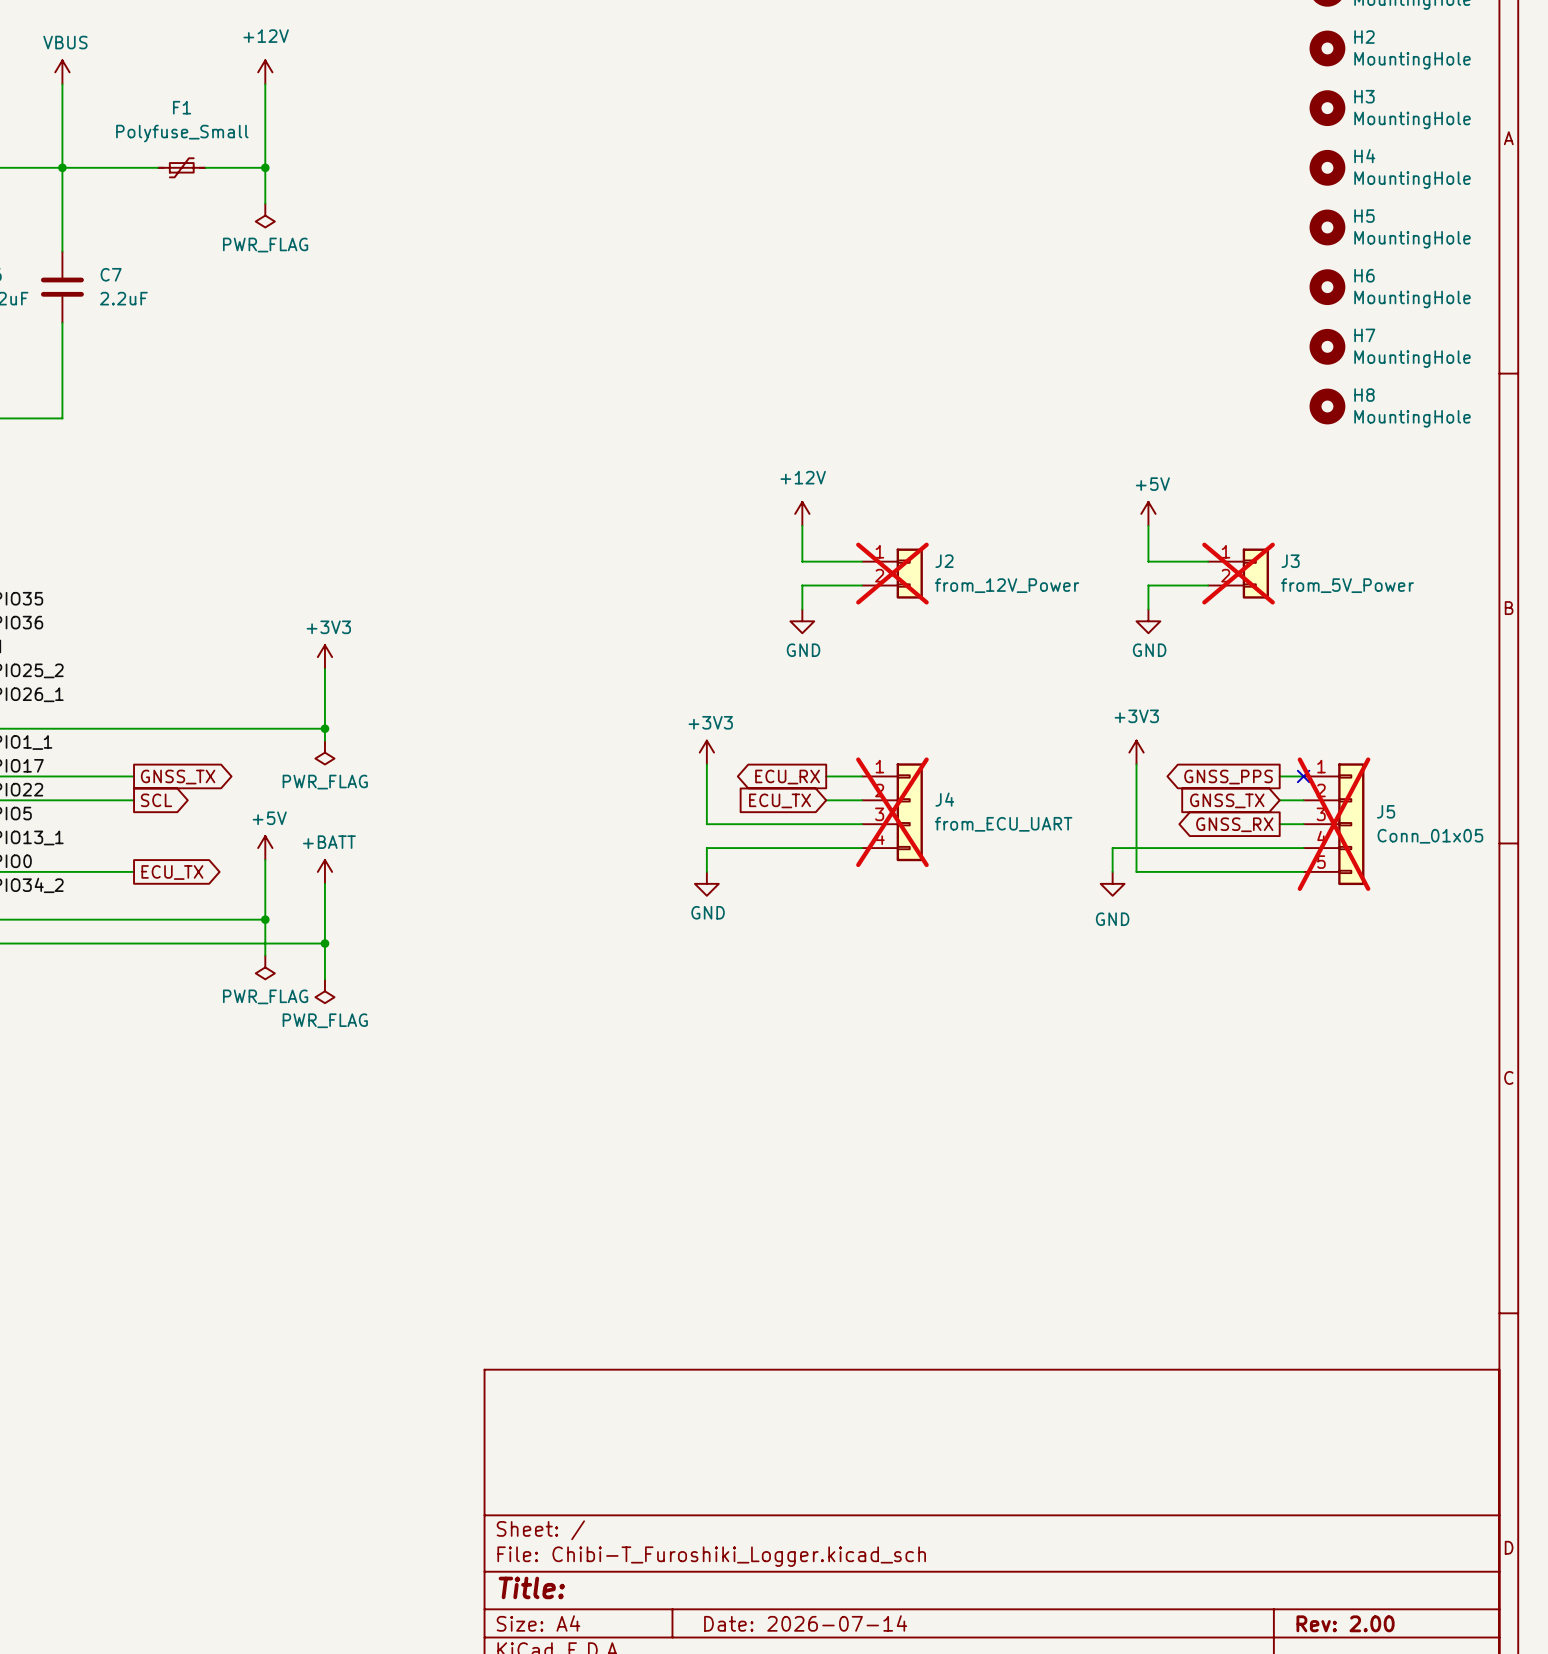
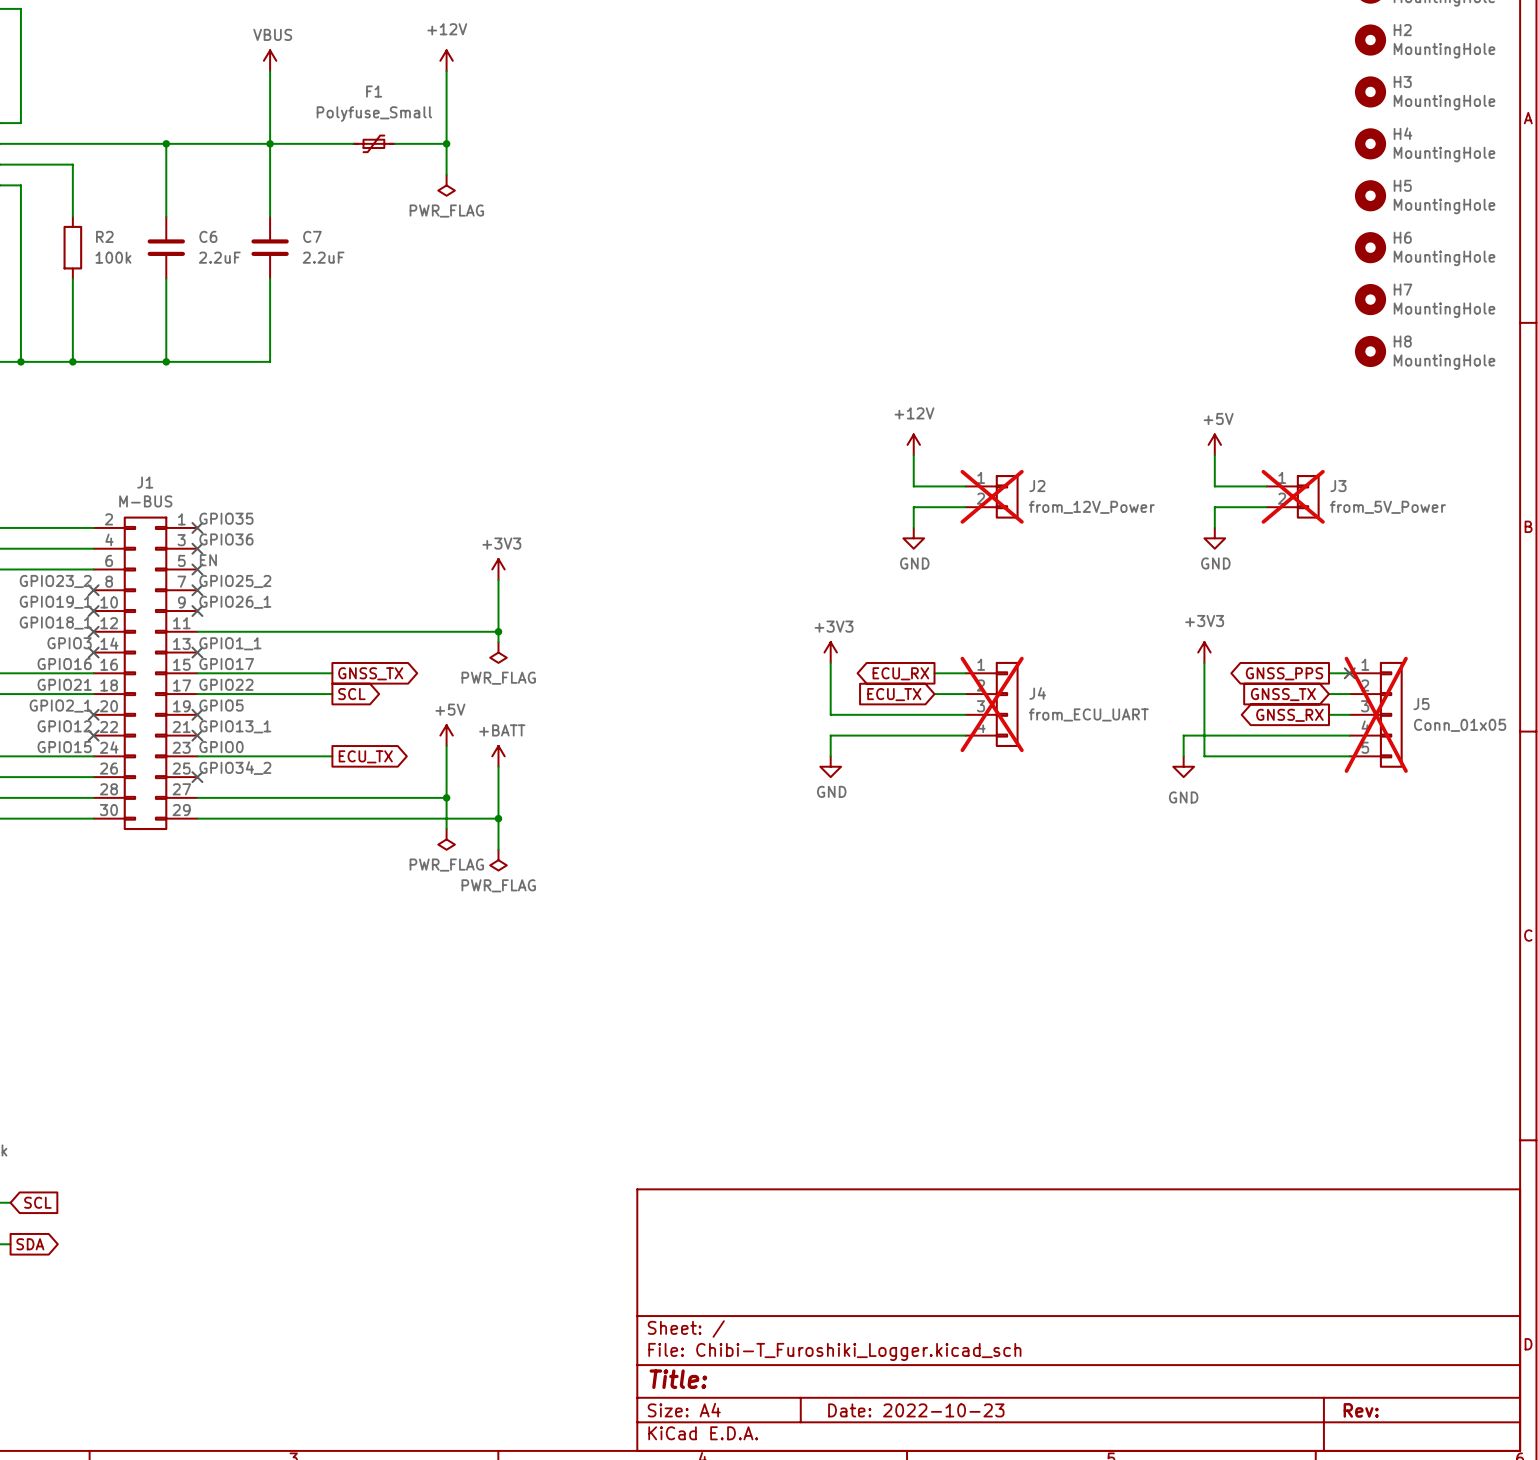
title block: Date: 2026-07-14 (805, 1623) -> Date: 2022-10-23 (916, 1410)
title block: Rev: 2.00 (1345, 1623) -> Rev: (1361, 1410)

